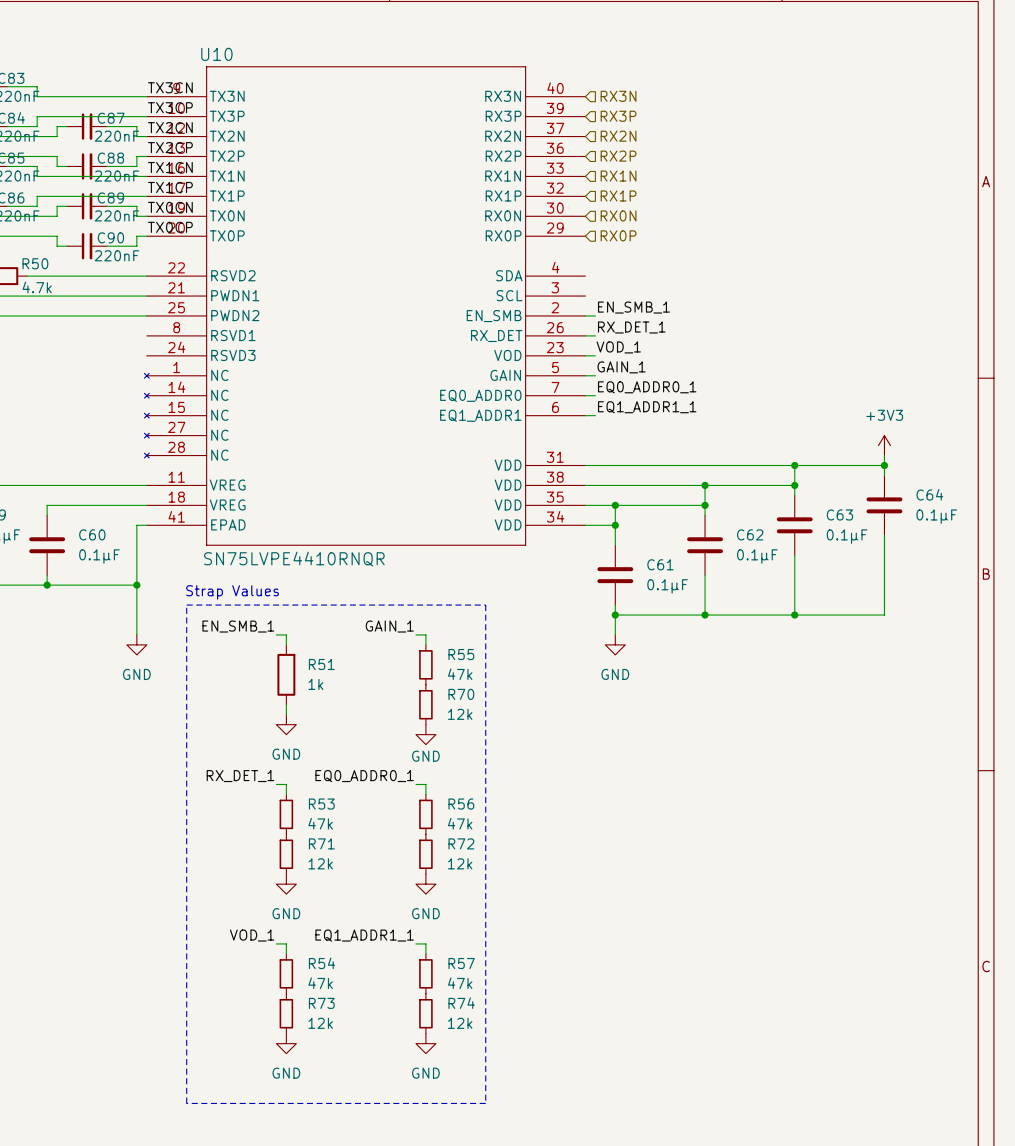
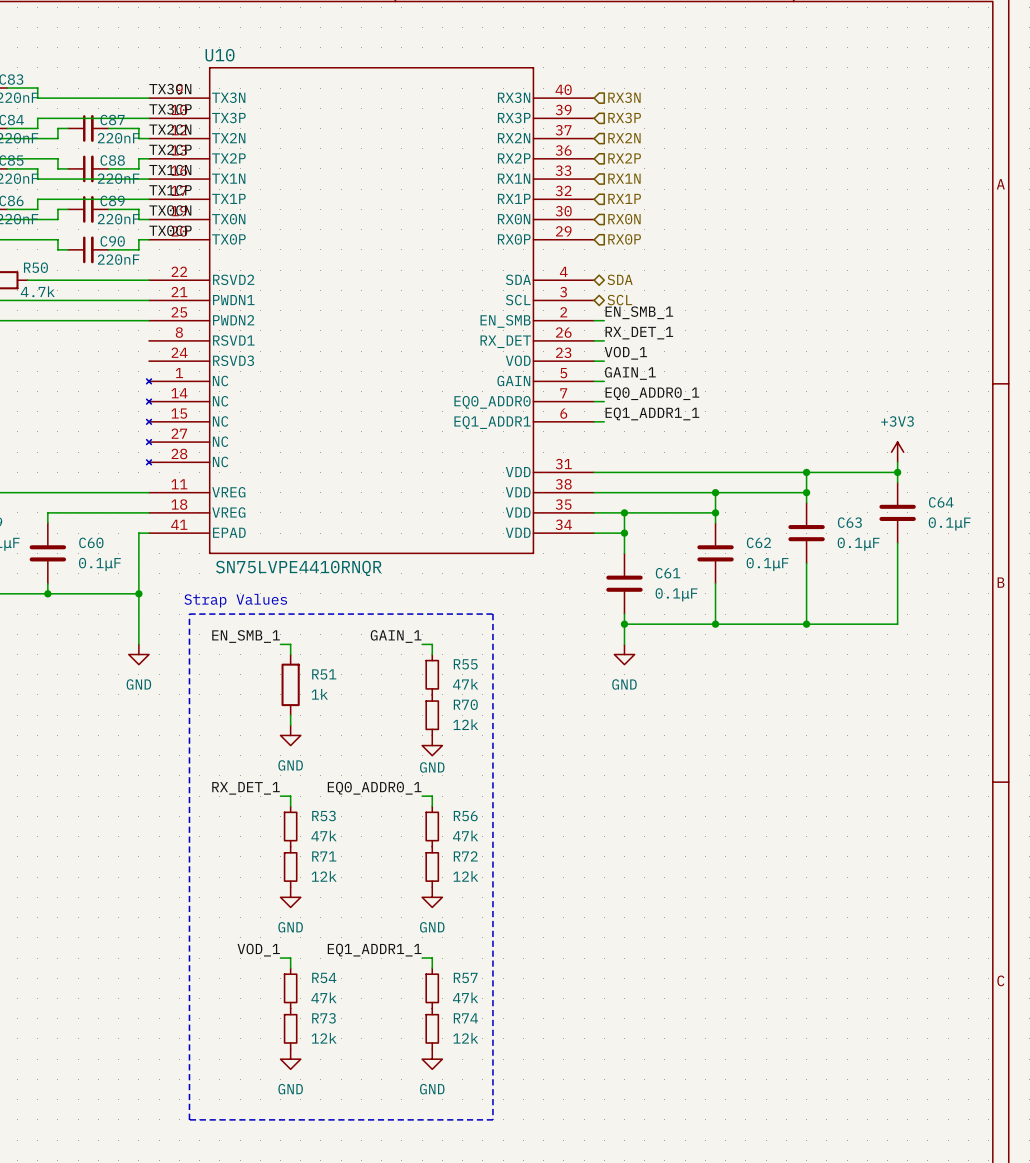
hierarchical label: none -> SDA (620, 279)
hierarchical label: none -> SCL (619, 300)

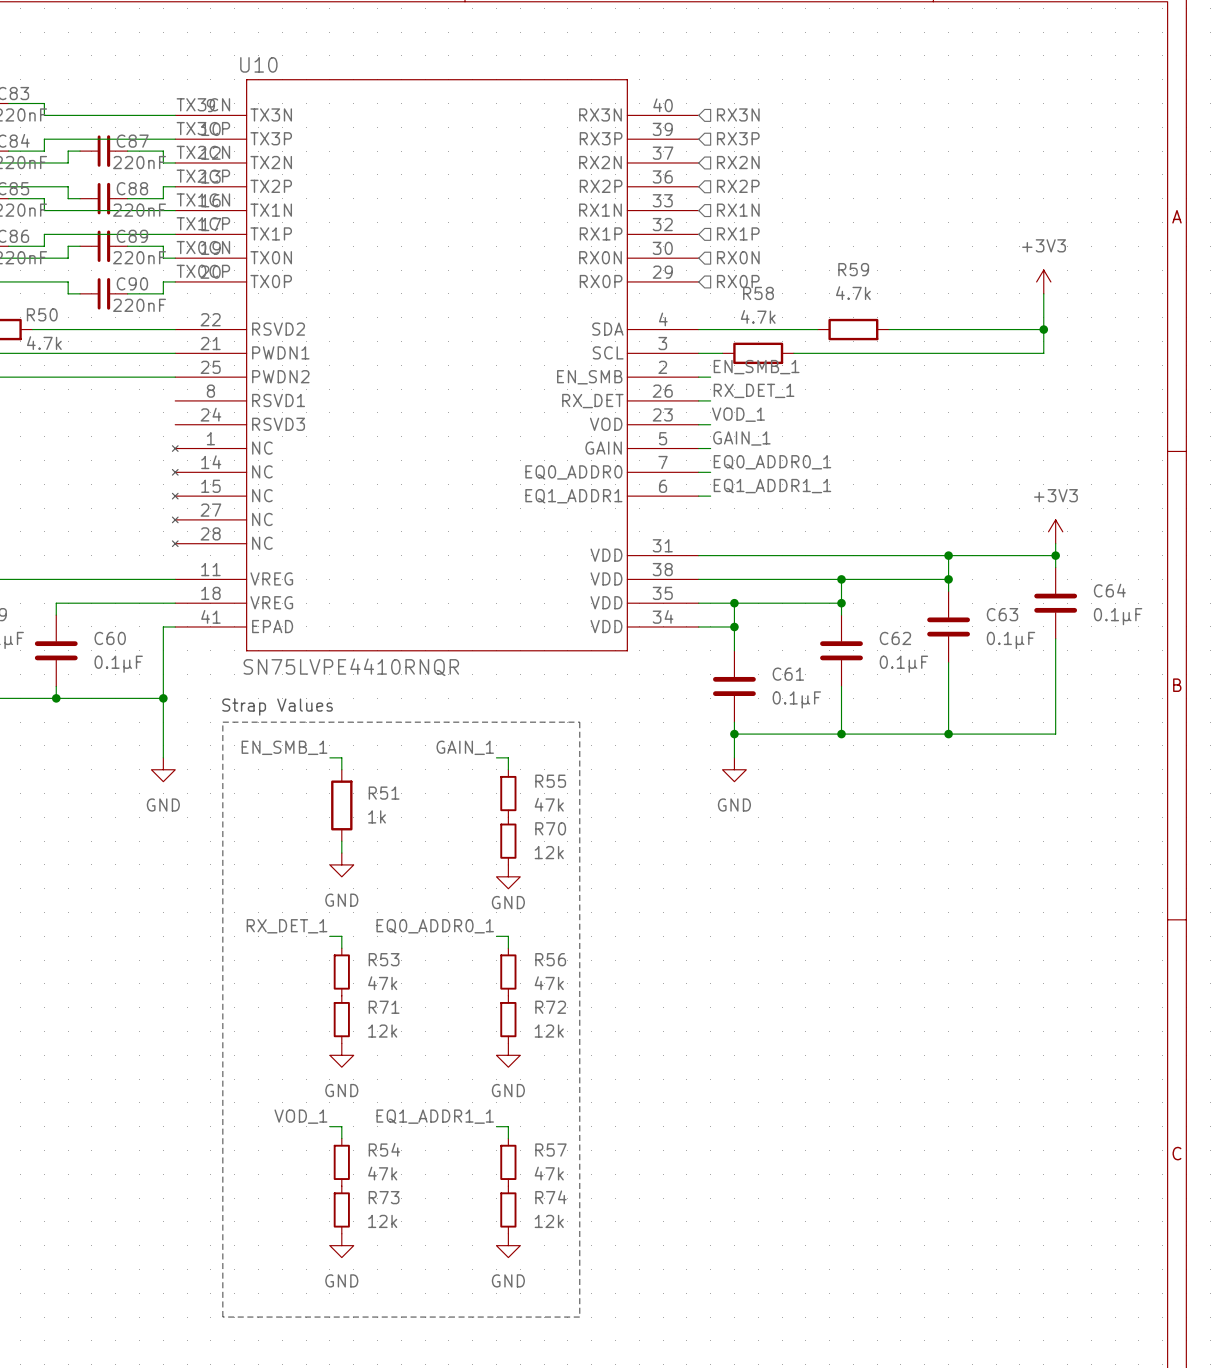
power symbol: none -> +3V3 (1043, 281)
wire: none -> (1043, 293) (1043, 353) (793, 353)
hierarchical label: SDA (620, 279) -> none
wire: none -> (698, 329) (817, 329)
R59: none -> 4.7k (853, 329)
wire: none -> (889, 329) (1043, 329)
junction: none -> (1043, 329)
wire: none -> (698, 353) (722, 353)
hierarchical label: SCL (619, 300) -> none
R58: none -> 4.7k (758, 353)

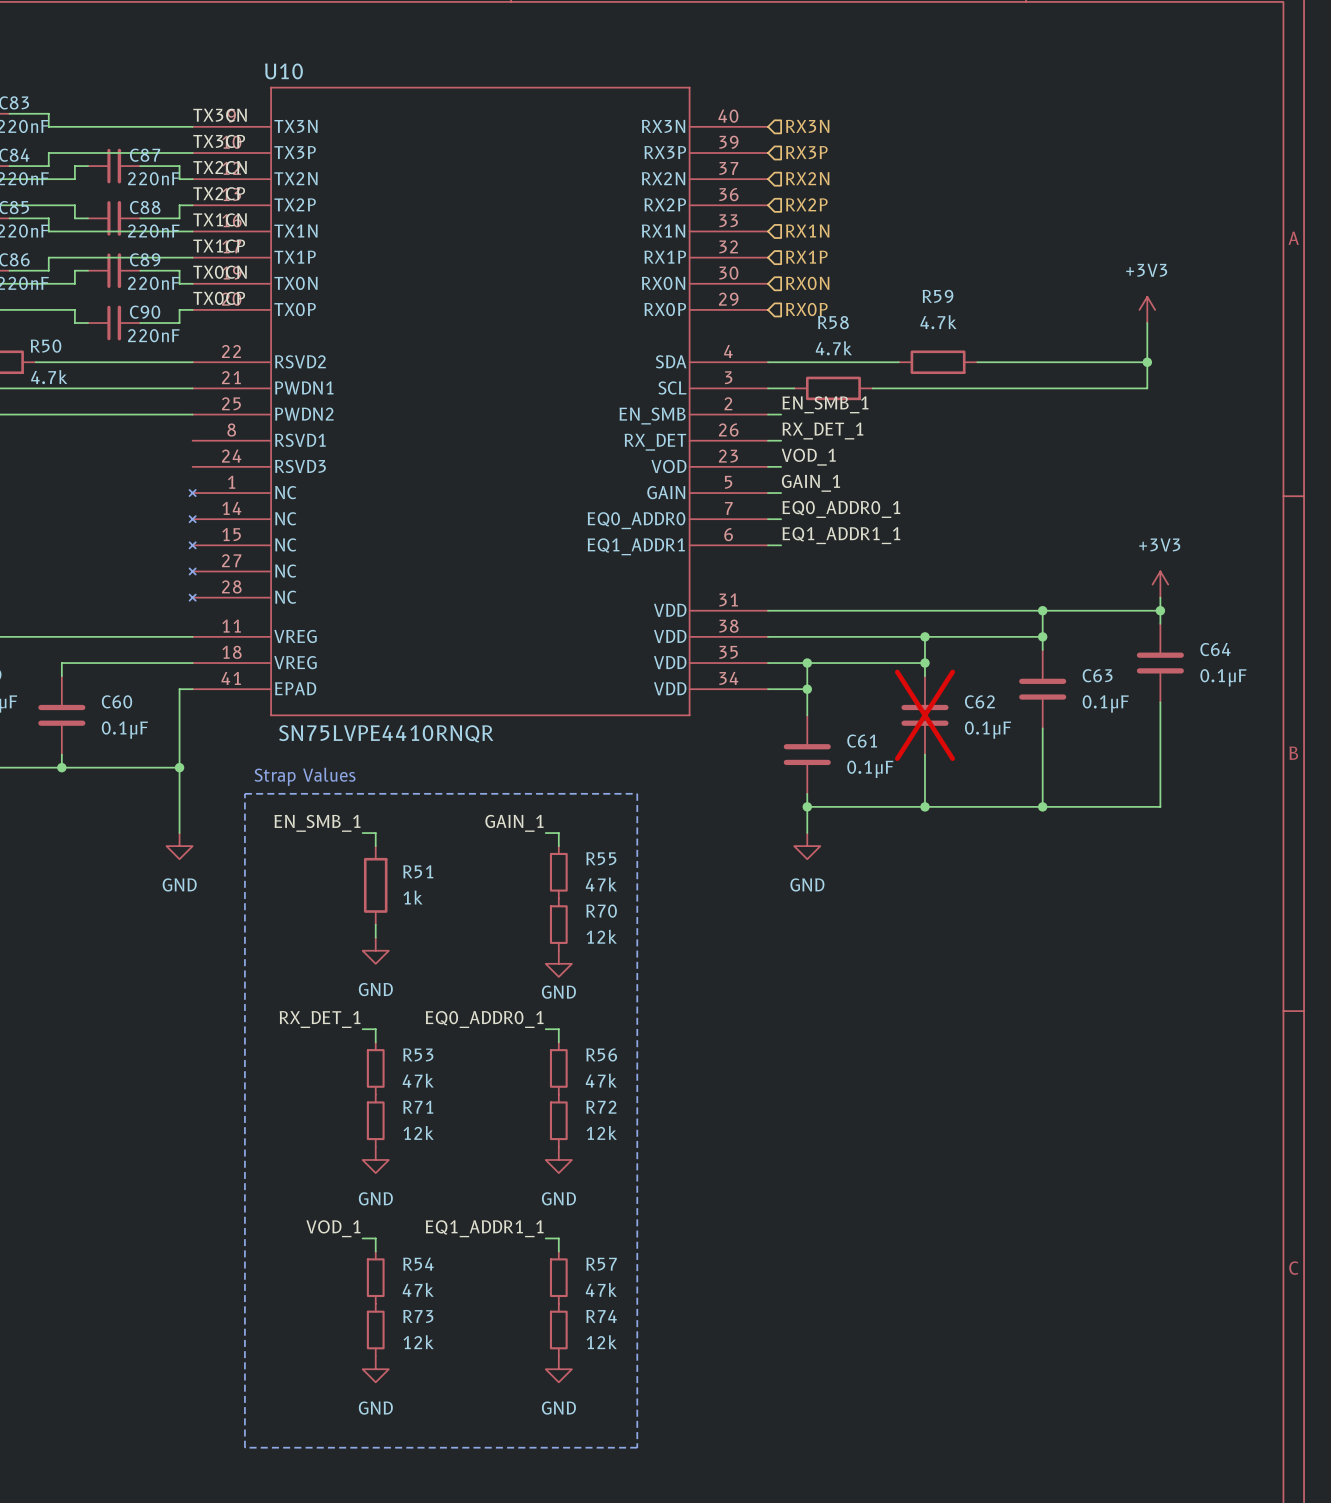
C62 do-not-place cross: none -> (924, 715)

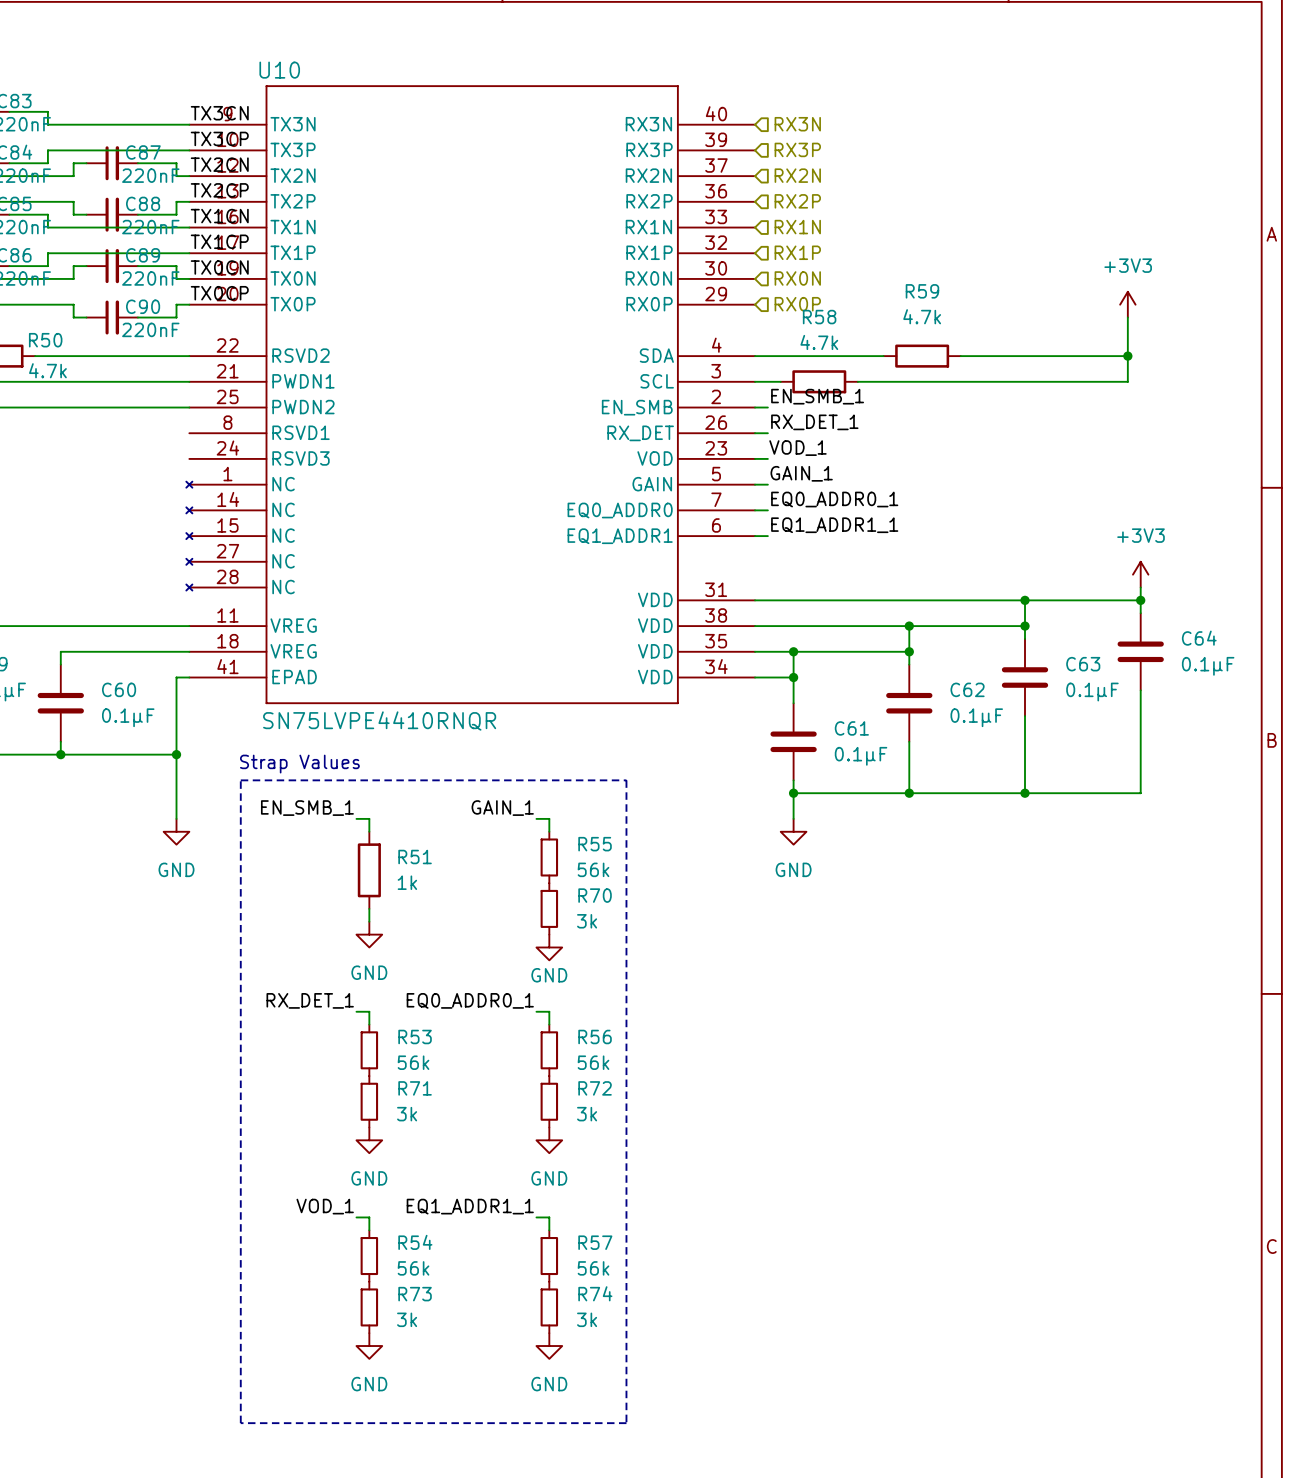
C62 do-not-place cross: (924, 715) -> none
R55 value: 47k (601, 884) -> 56k (593, 869)
R70 value: 12k (601, 936) -> 3k (587, 921)
R53 value: 47k (418, 1080) -> 56k (413, 1062)
R56 value: 47k (601, 1080) -> 56k (593, 1062)
R71 value: 12k (418, 1132) -> 3k (407, 1114)
R72 value: 12k (601, 1132) -> 3k (587, 1114)
R54 value: 47k (418, 1289) -> 56k (413, 1268)
R57 value: 47k (601, 1289) -> 56k (593, 1268)
R73 value: 12k (418, 1342) -> 3k (407, 1319)
R74 value: 12k (601, 1342) -> 3k (587, 1319)

